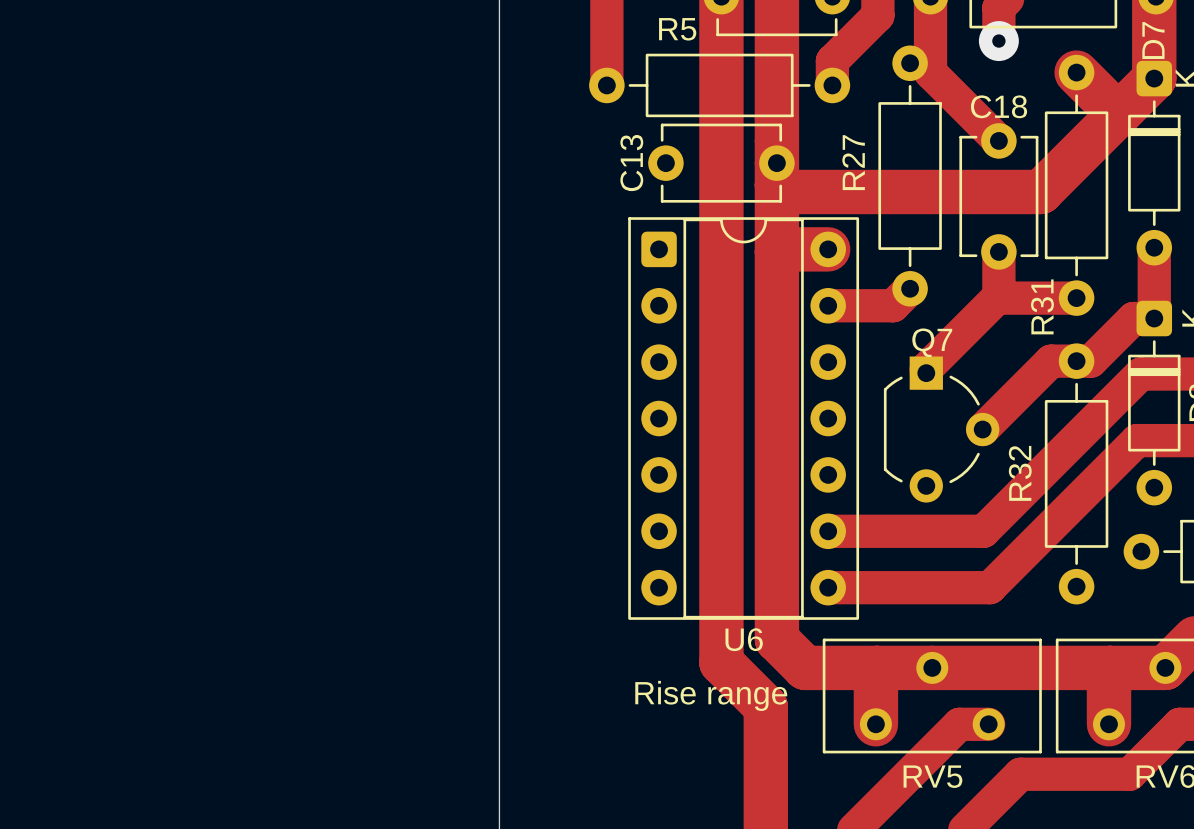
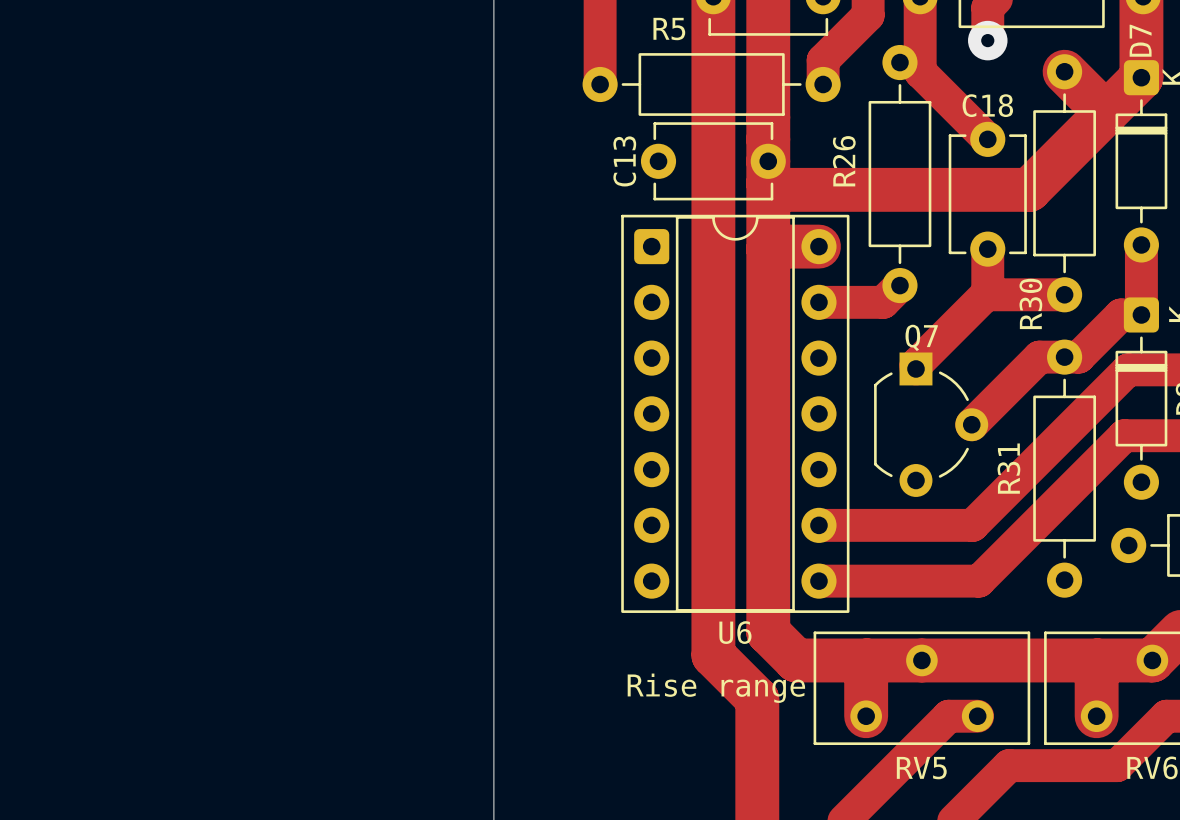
R27 name: R27 (853, 162) -> R26 (844, 161)
R31 name: R31 (1042, 306) -> R30 (1030, 303)
R32 name: R32 (1020, 473) -> R31 (1008, 468)

